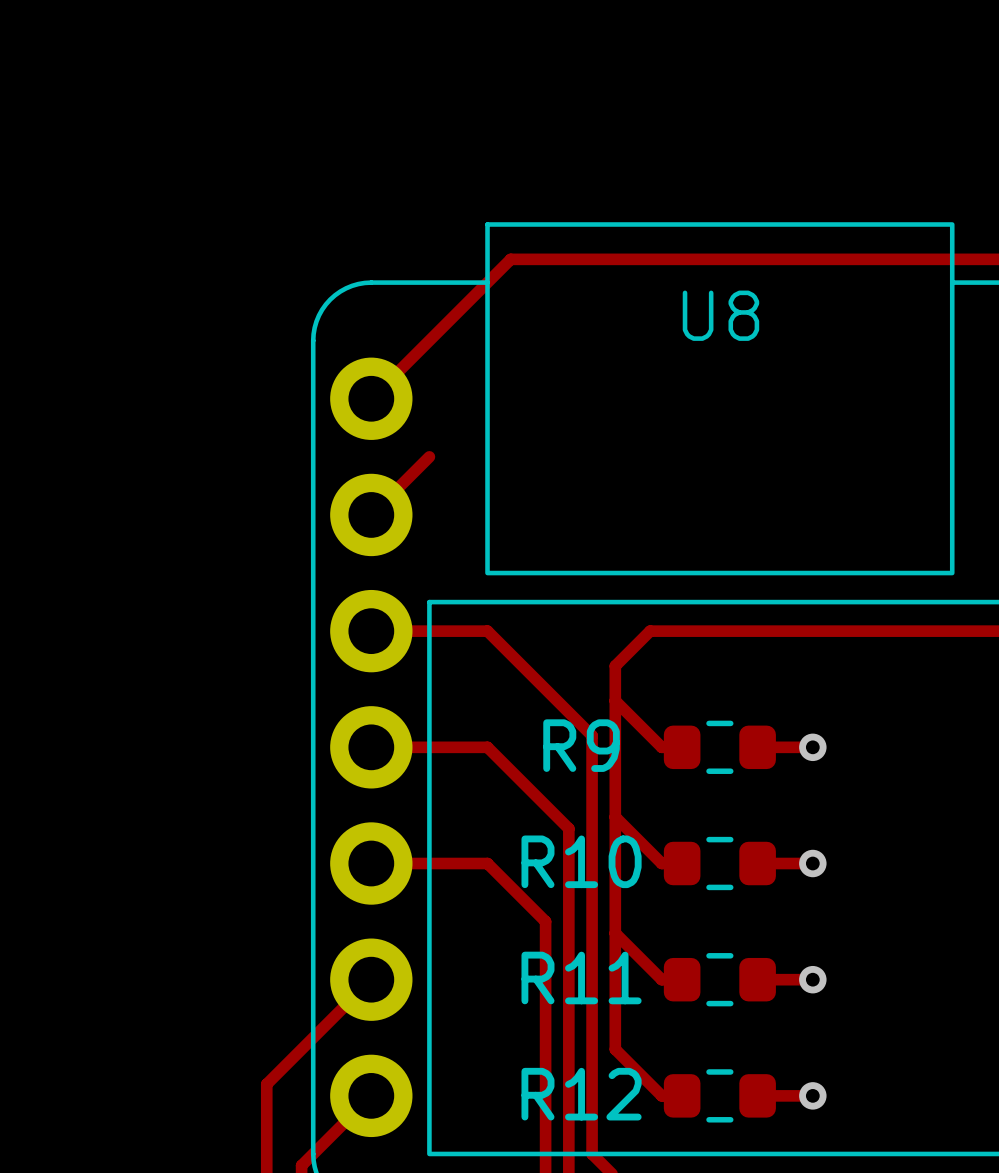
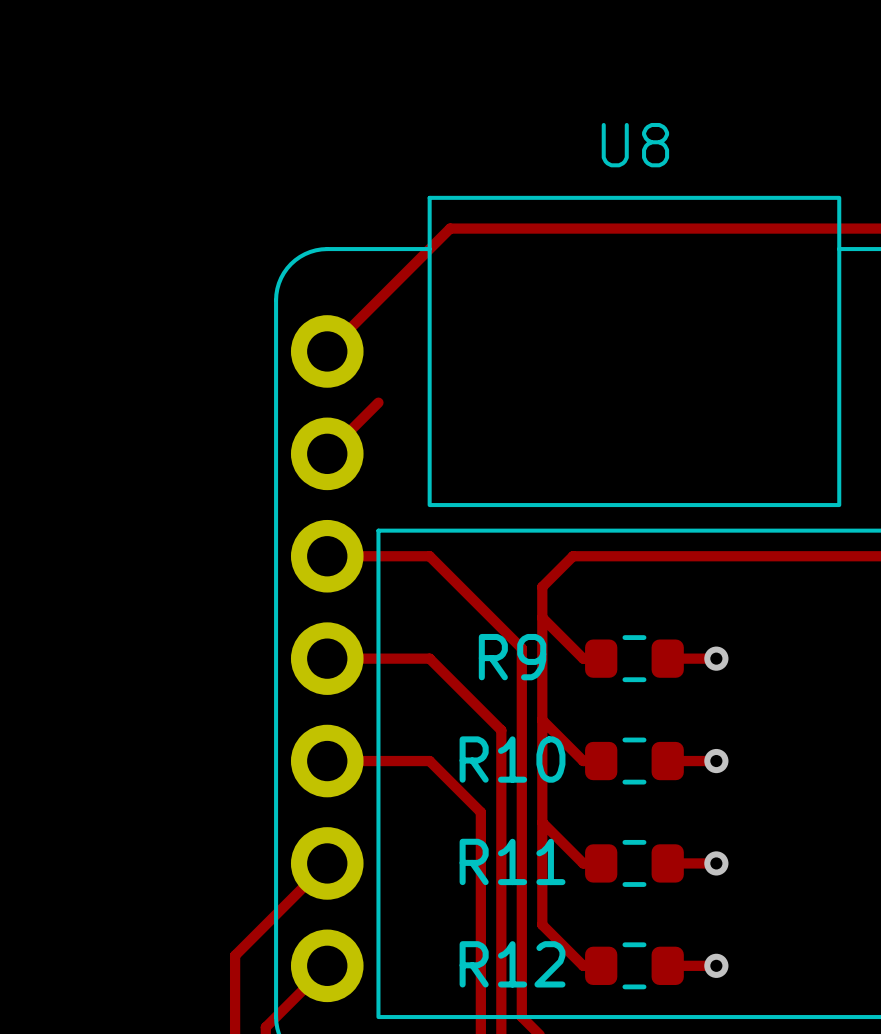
U8 name position: U8 (720, 315) -> U8 (635, 145)

